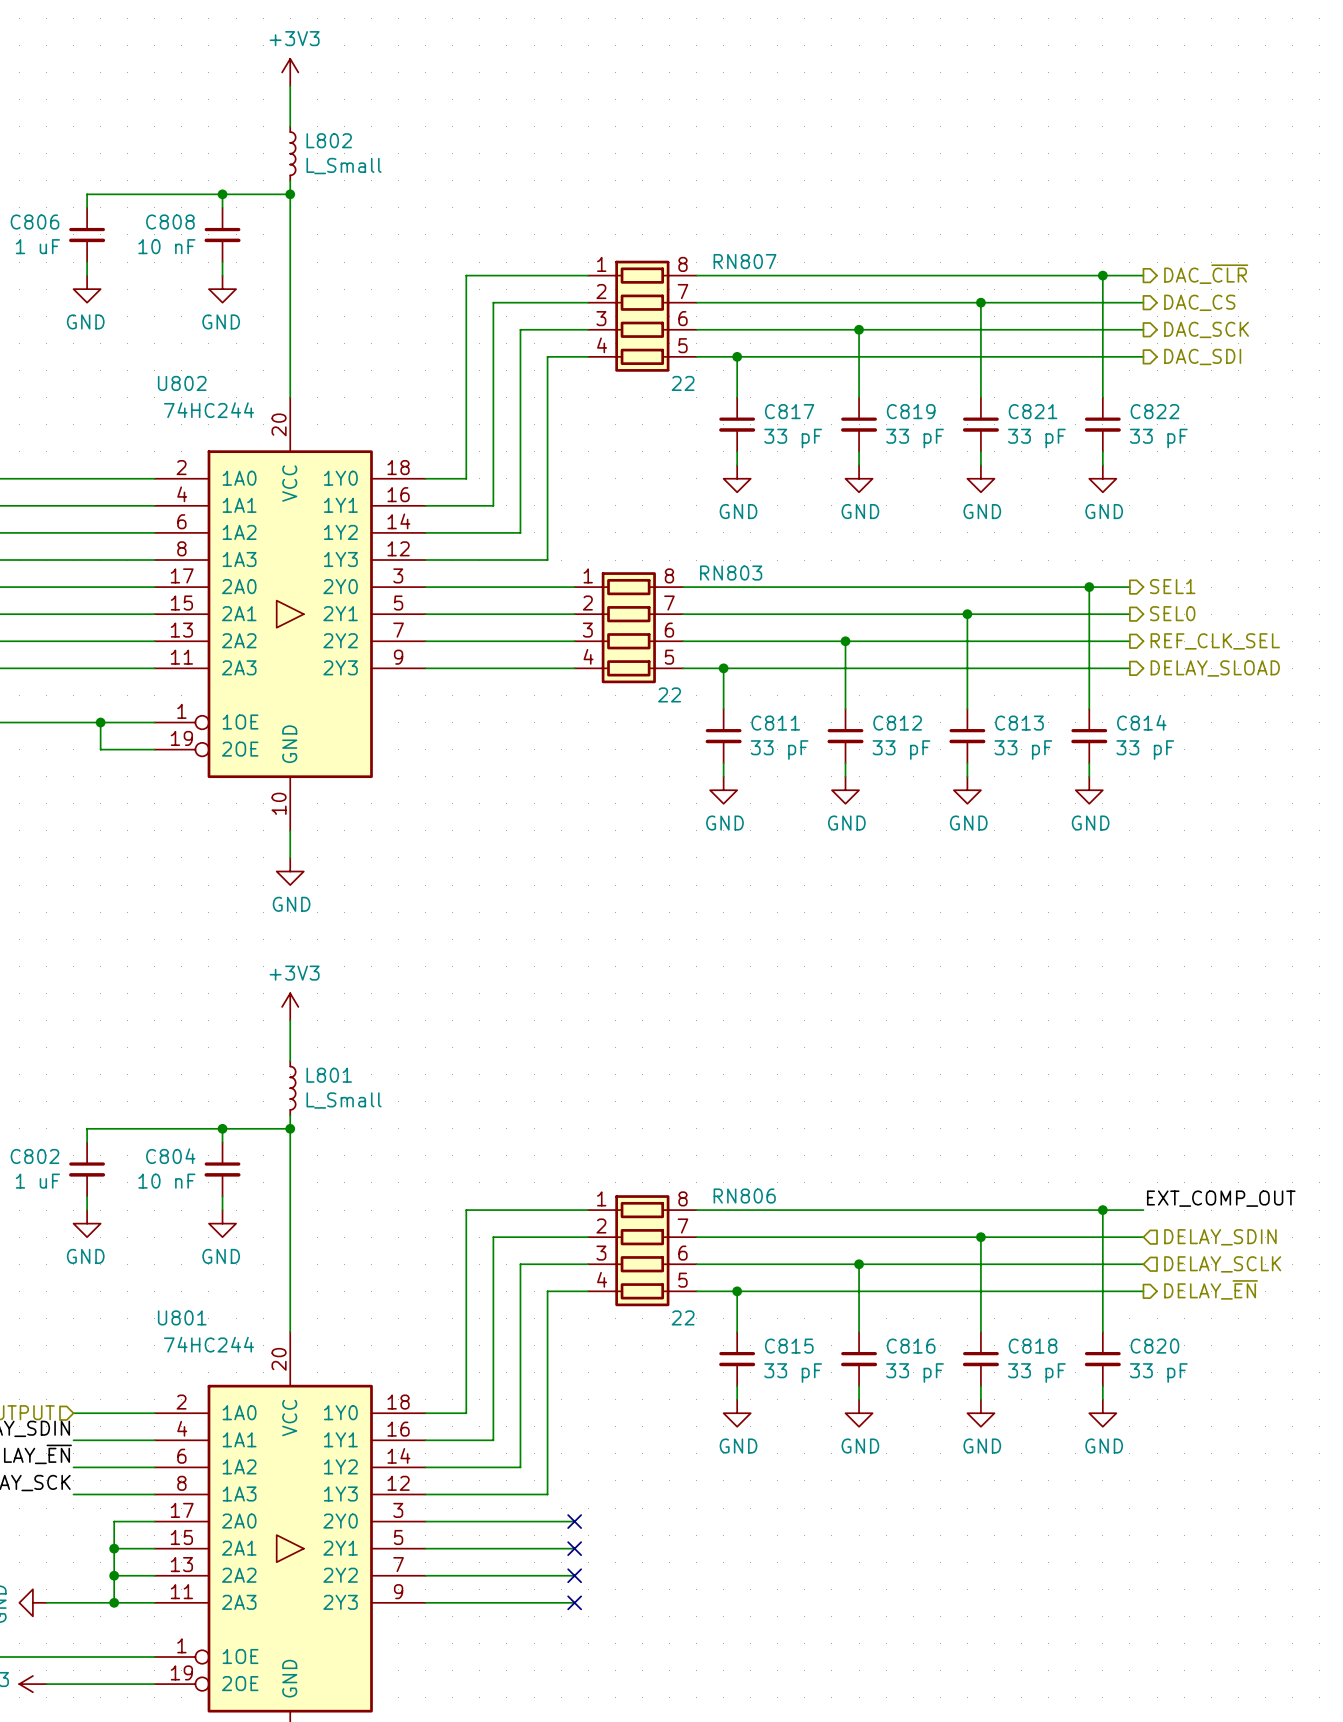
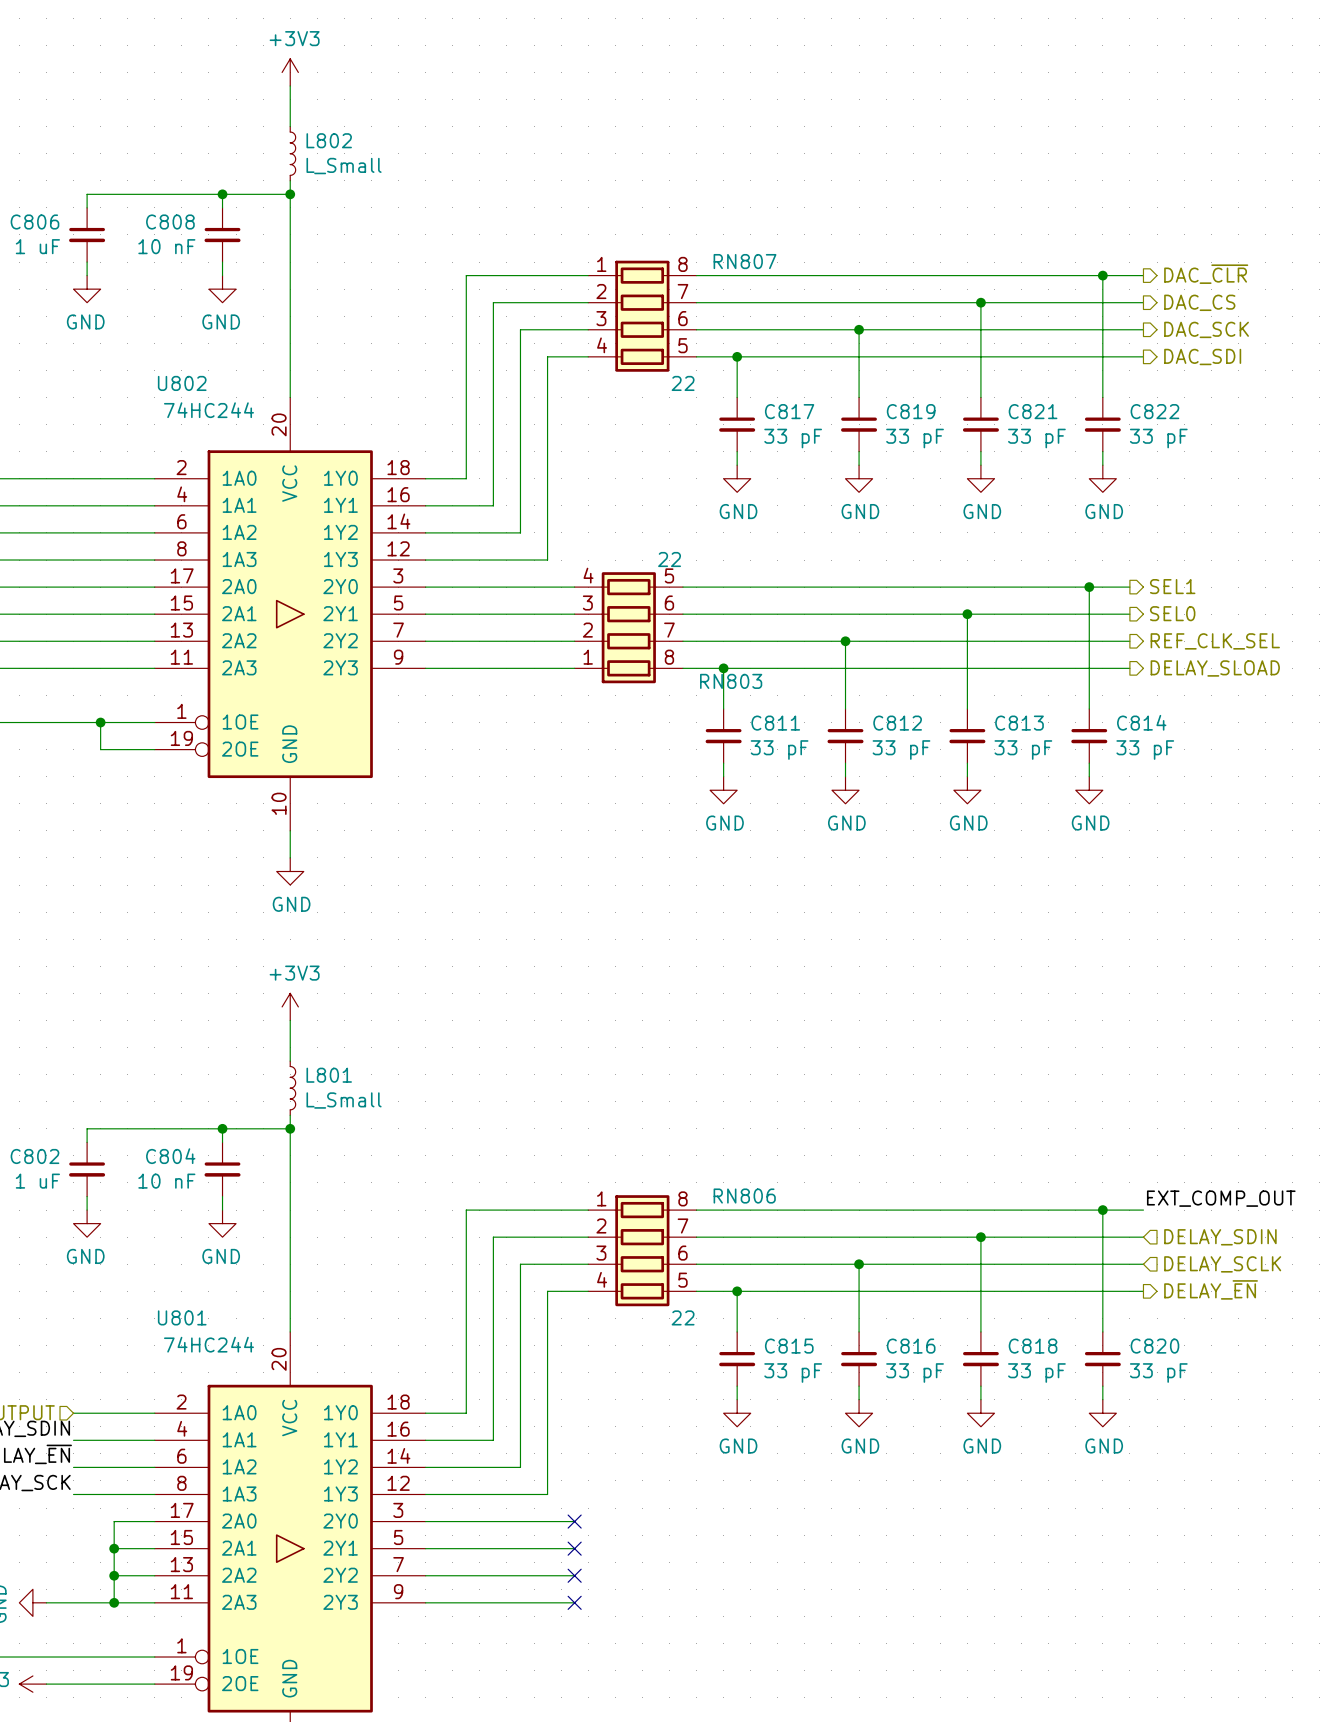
RN803 flip: as is (628, 627) -> up-down (628, 627)

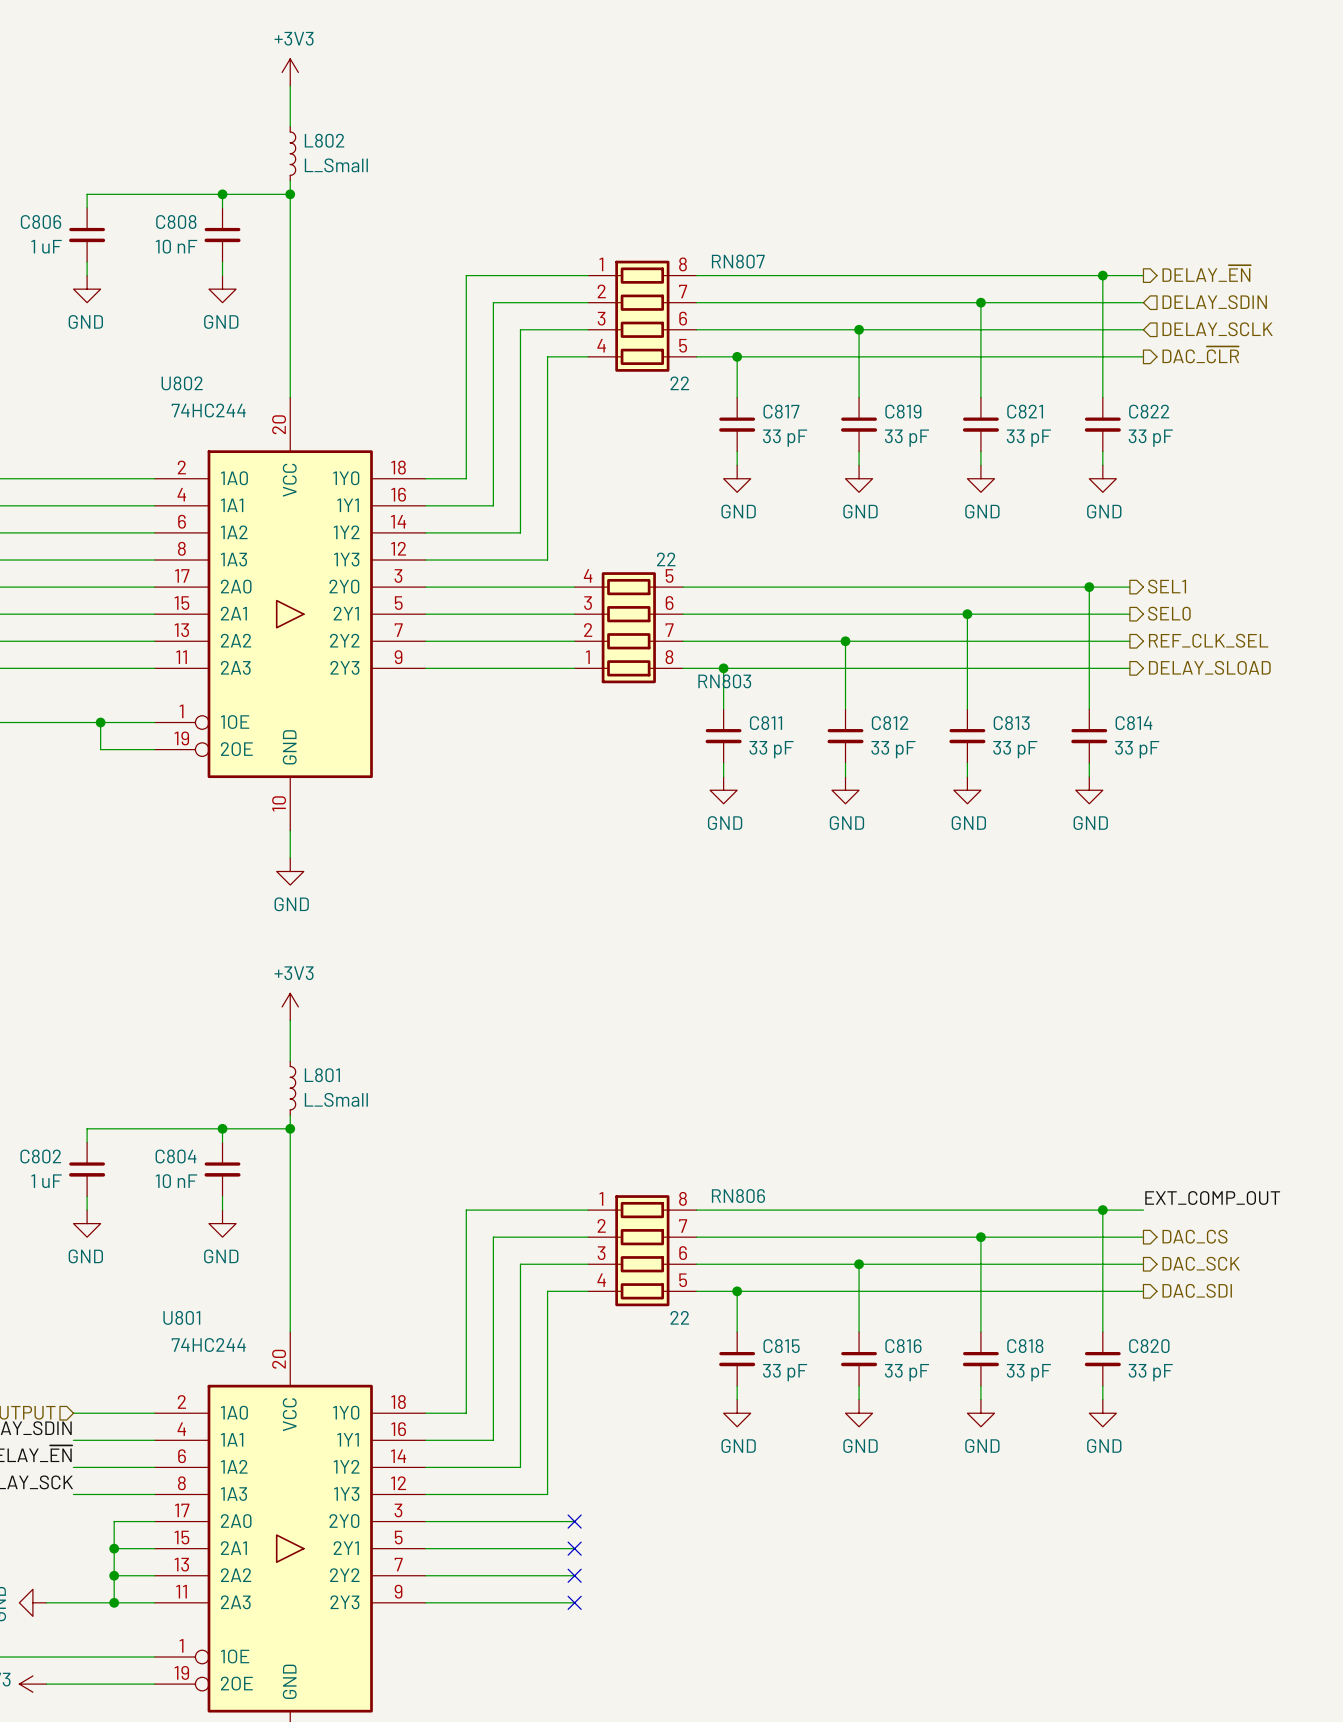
hierarchical label: DAC_~{CLR} (1206, 274) -> DELAY_~{EN} (1206, 273)
hierarchical label shape: output (1199, 302) -> input (1214, 302)
hierarchical label: DAC_CS (1199, 302) -> DELAY_SDIN (1214, 302)
hierarchical label shape: output (1206, 329) -> input (1217, 329)
hierarchical label: DAC_SCK (1206, 329) -> DELAY_SCLK (1217, 329)
hierarchical label: DAC_SDI (1202, 356) -> DAC_~{CLR} (1200, 354)
hierarchical label shape: input (1220, 1237) -> output (1194, 1236)
hierarchical label: DELAY_SDIN (1220, 1237) -> DAC_CS (1194, 1236)
hierarchical label shape: input (1222, 1264) -> output (1201, 1263)
hierarchical label: DELAY_SCLK (1222, 1264) -> DAC_SCK (1201, 1263)
hierarchical label: DELAY_~{EN} (1211, 1289) -> DAC_SDI (1197, 1290)

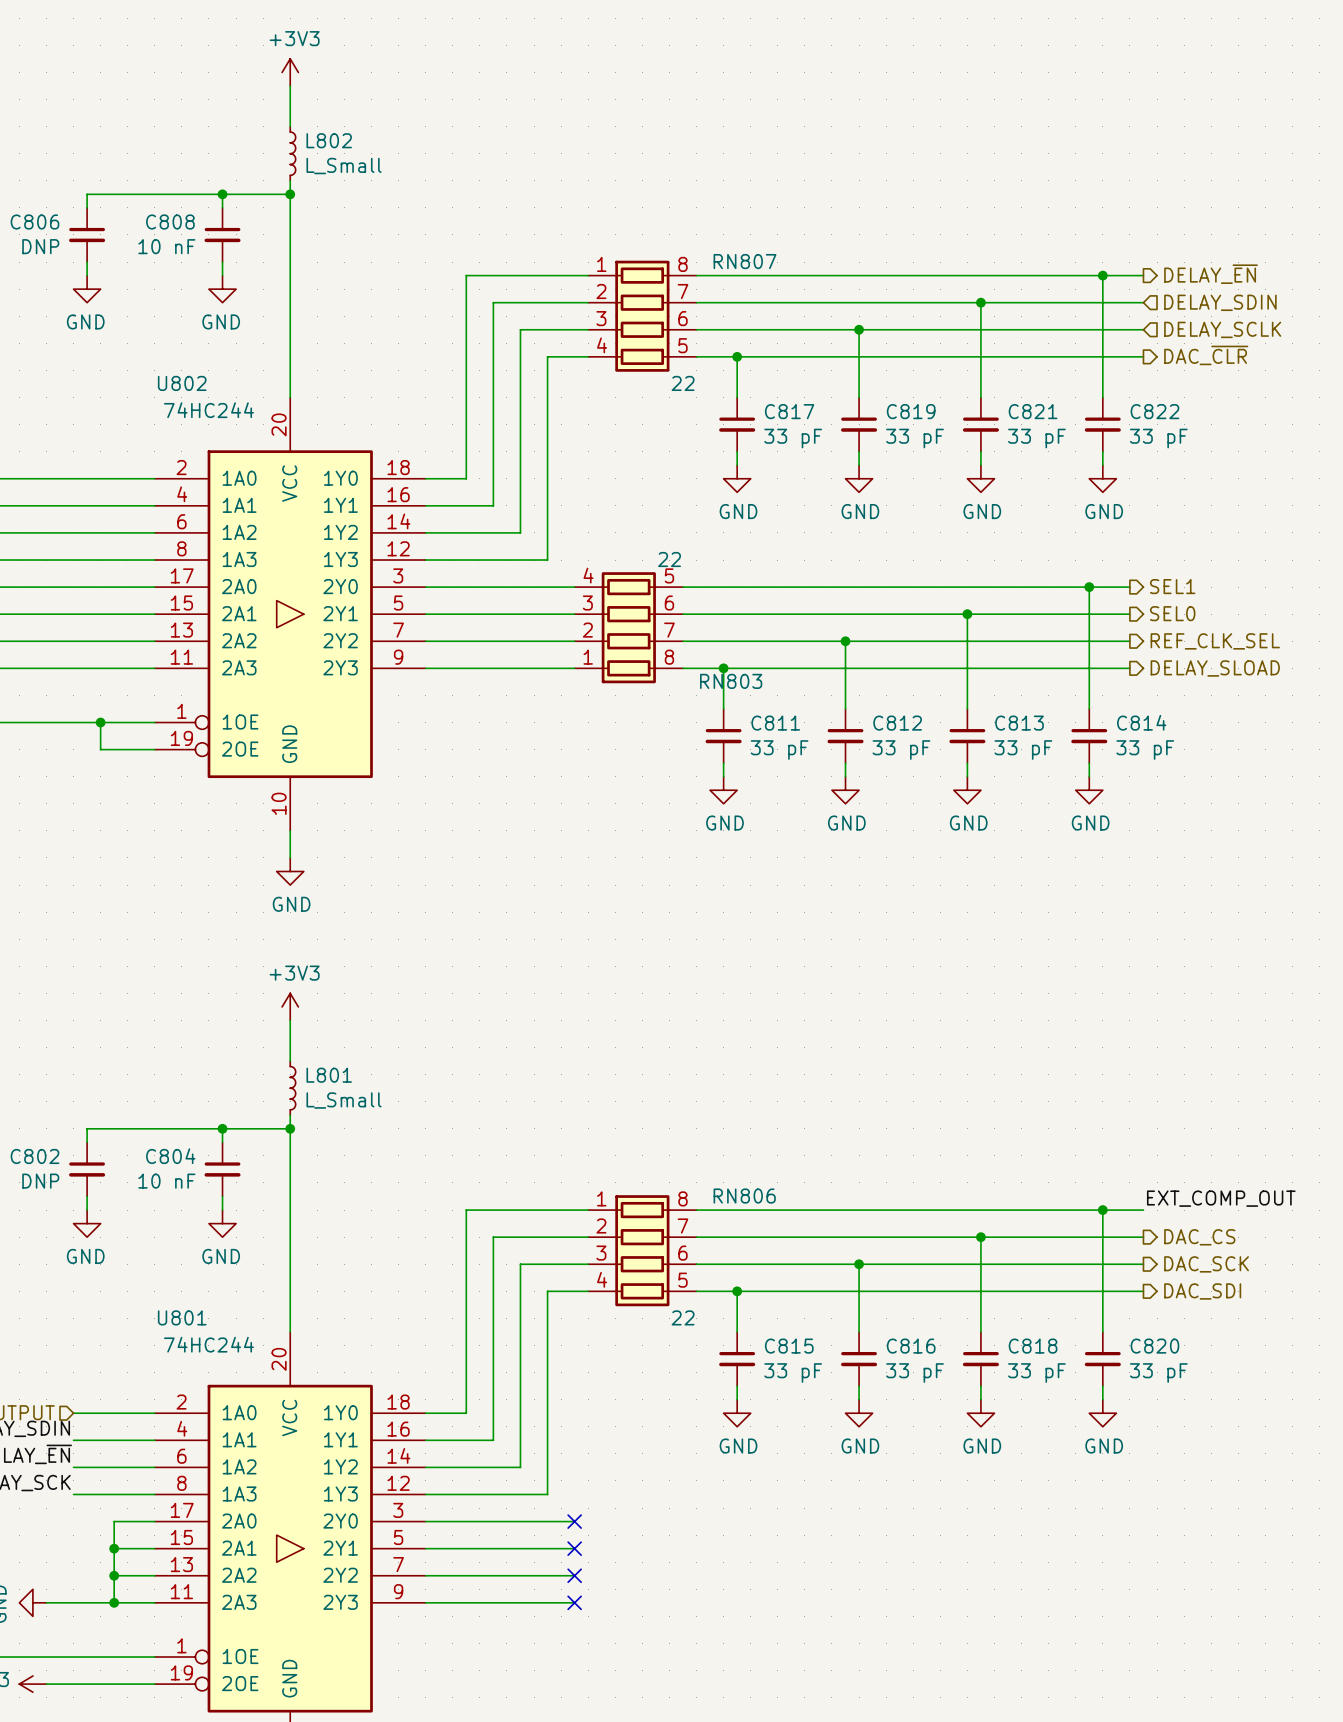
C806 value: 1 uF (46, 246) -> DNP (40, 246)
C802 value: 1 uF (46, 1181) -> DNP (40, 1181)

